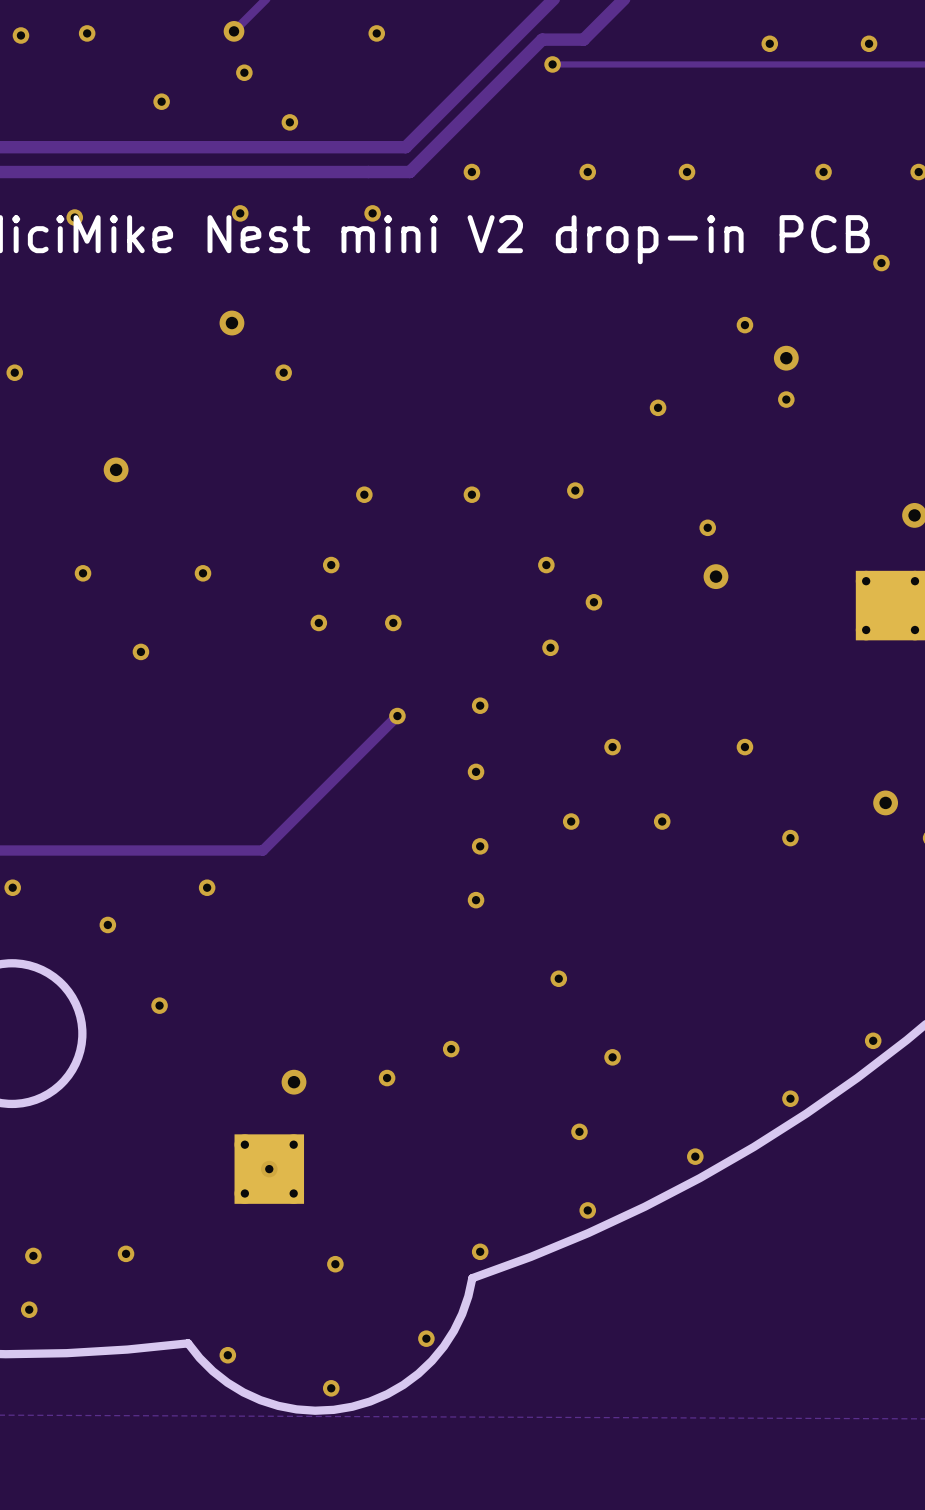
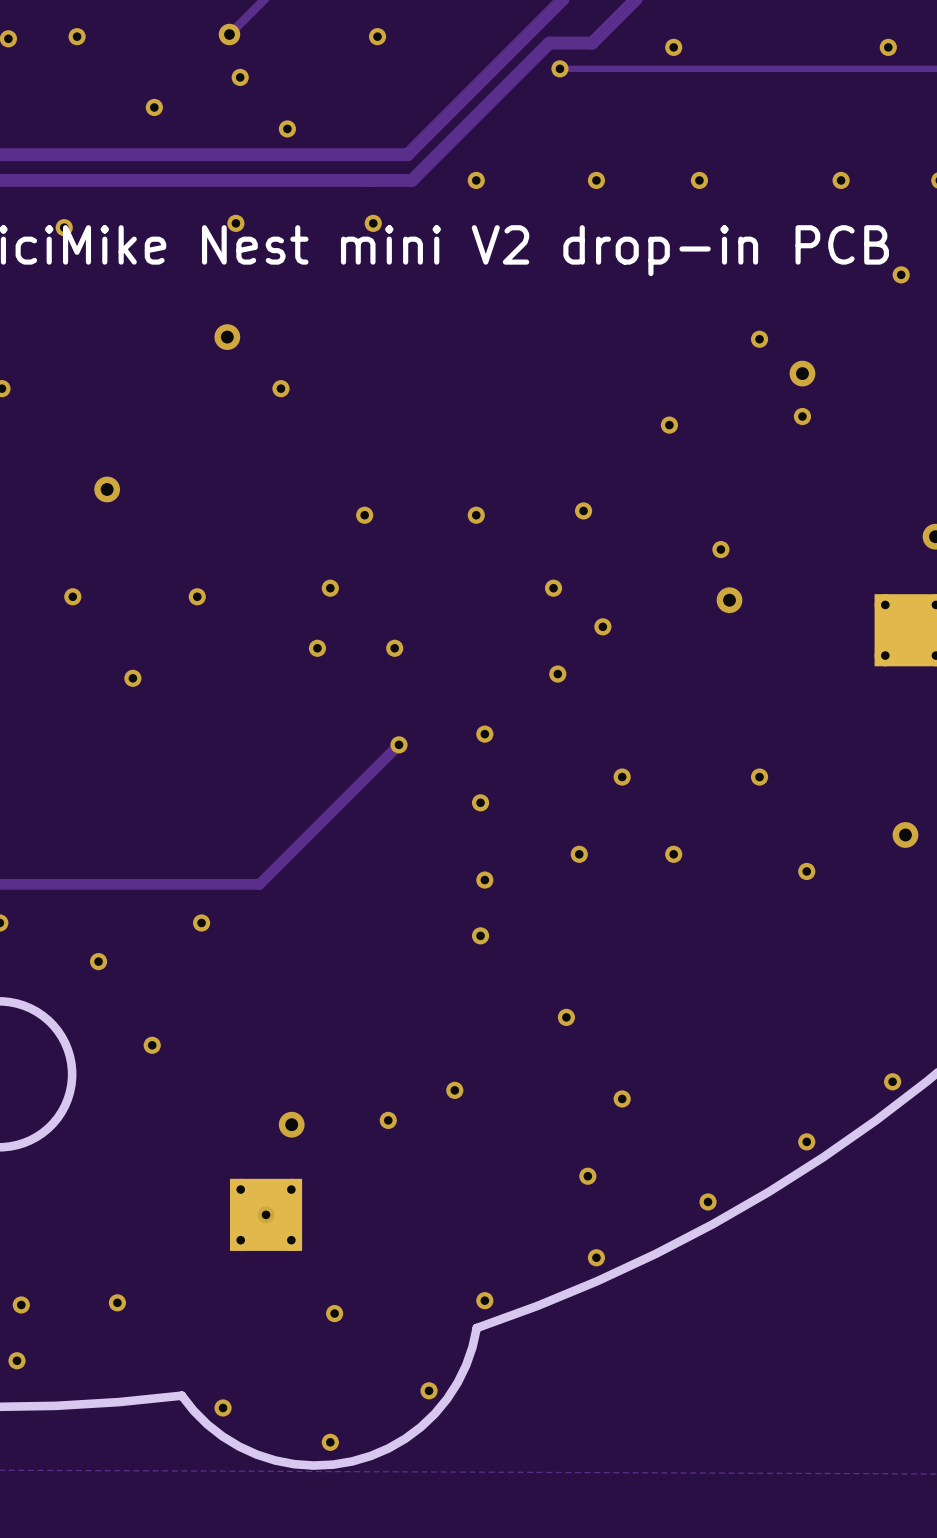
via: none -> (673, 47)
via: (769, 43) -> none

